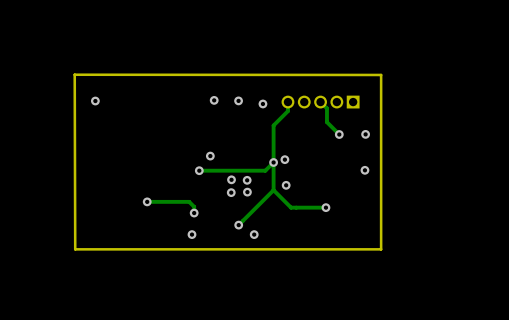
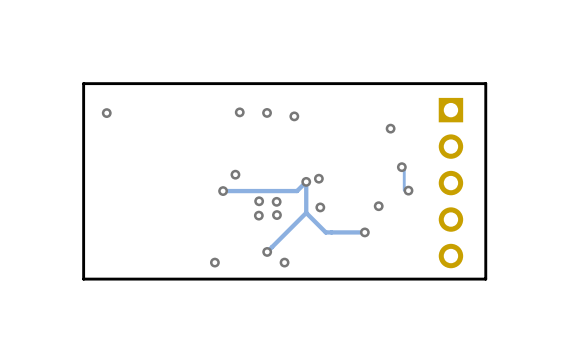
track: (287, 102) (287, 111) (273, 125) (273, 162) -> none
track: (320, 102) (326, 108) (326, 122) (339, 134) -> none
part: (320, 102) -> none
via: none -> (390, 128)
via: (339, 134) -> none
via: (365, 134) -> none
track: none -> (401, 167) (404, 169) (404, 190)
via: none -> (401, 167)
part: none -> (450, 183)
via: none -> (378, 206)
track: (147, 201) (189, 201) (194, 206) (194, 213) -> none
via: (147, 201) -> none
via: (194, 213) -> none
board edge: (381, 249) (381, 74) (74, 74) (75, 249) -> (426, 279) (485, 279) (485, 83) (83, 83) (84, 279)

